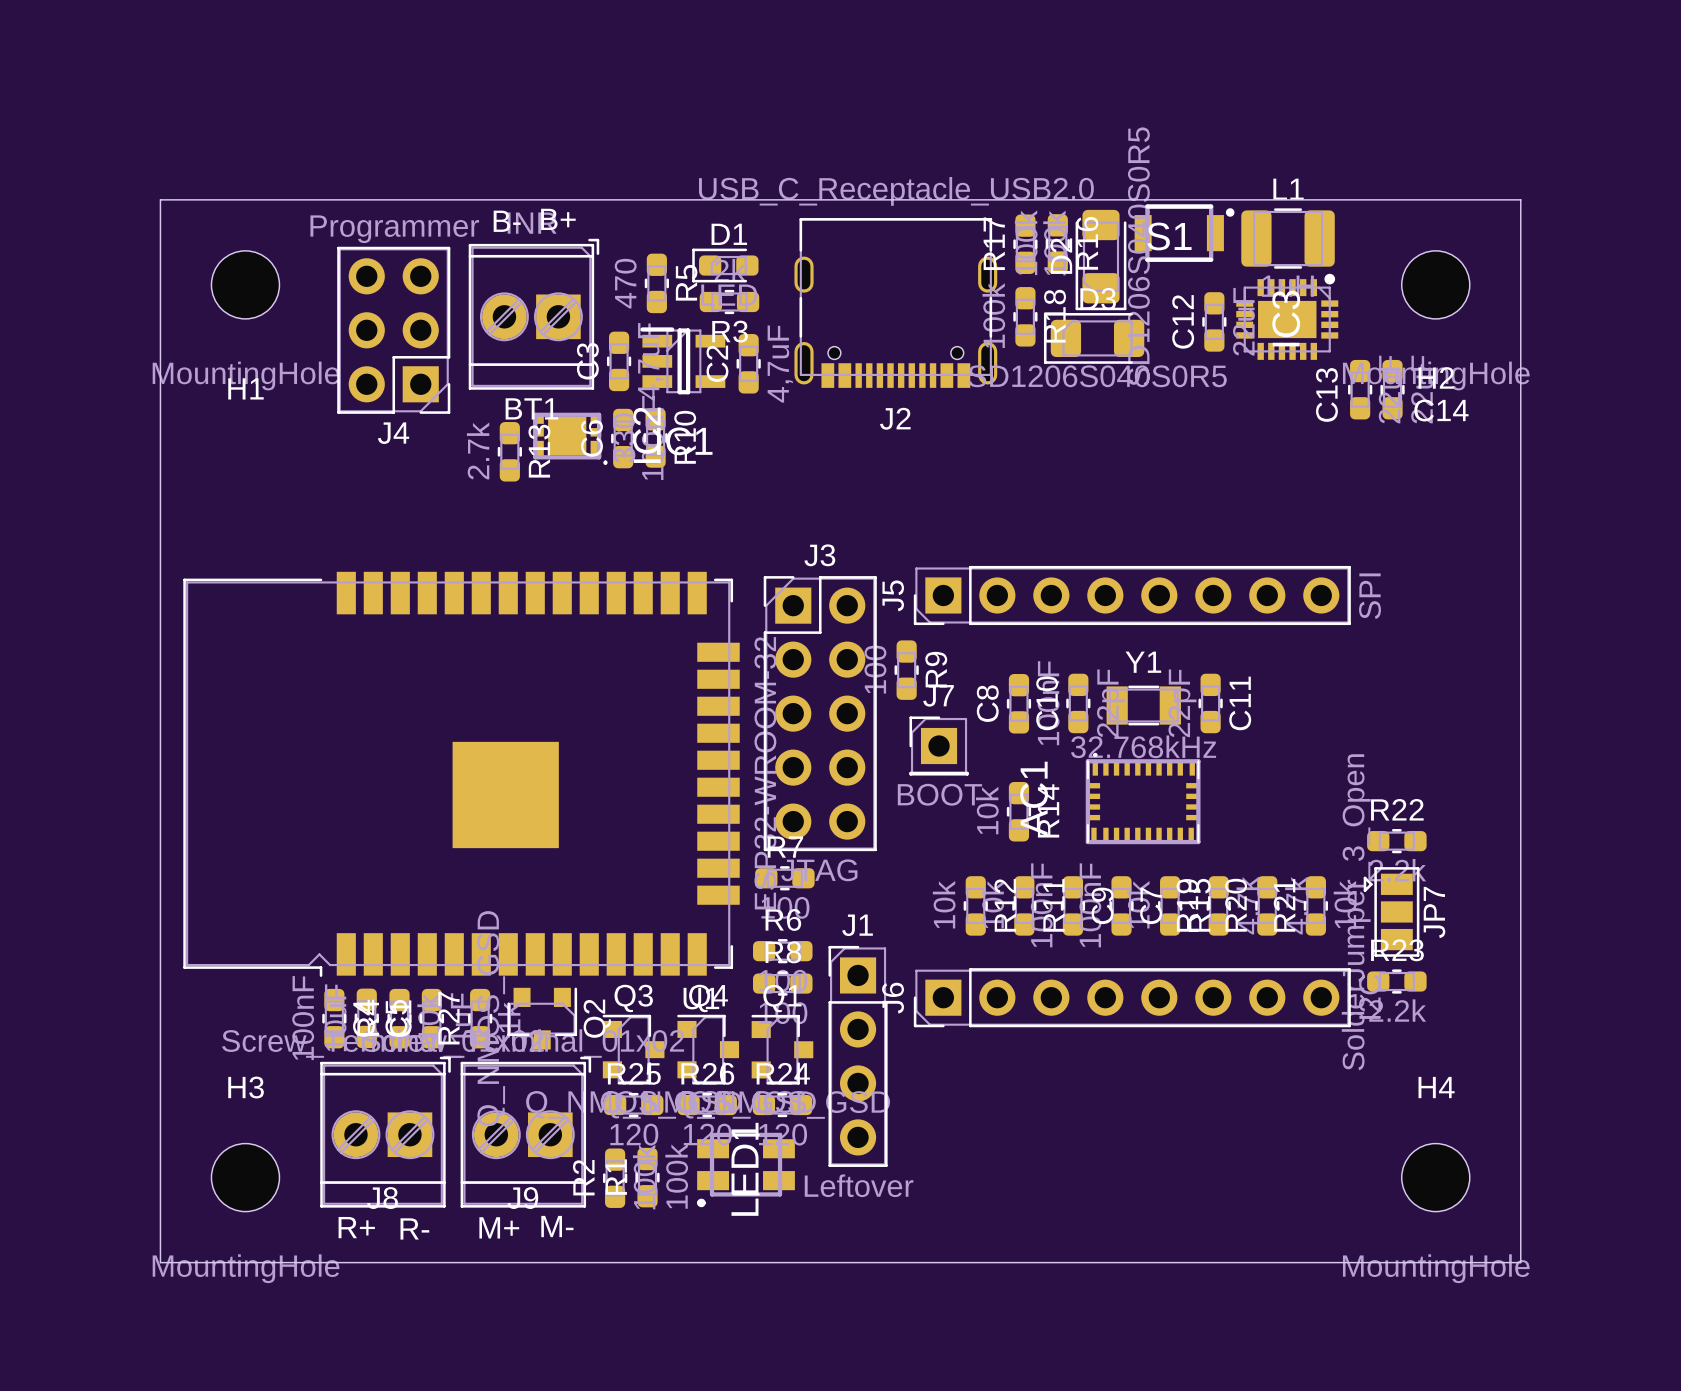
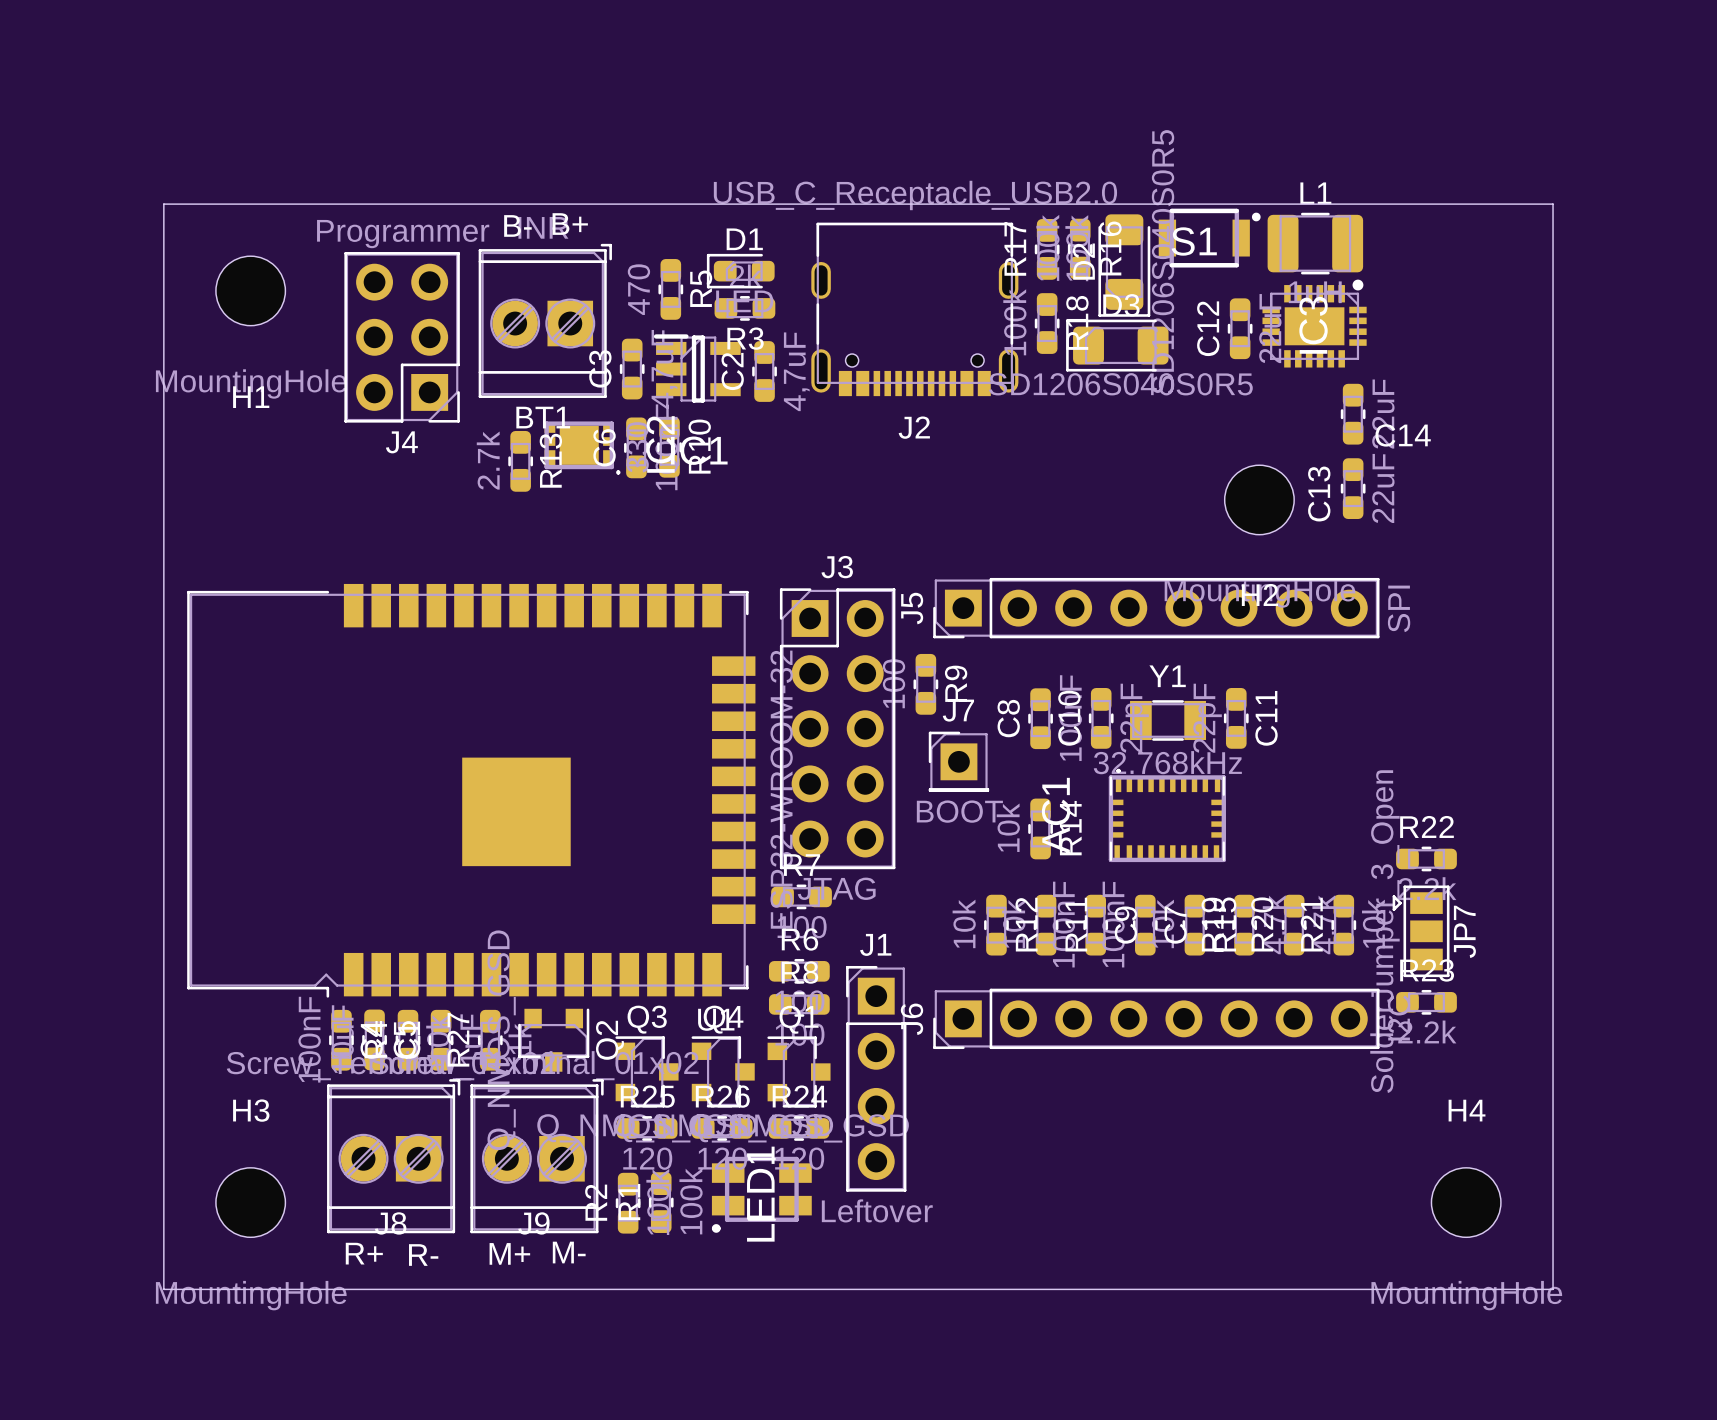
H2 position: (1435, 284) -> (1259, 499)
C13 position: (1360, 389) -> (1353, 488)
C14 position: (1392, 389) -> (1353, 414)

